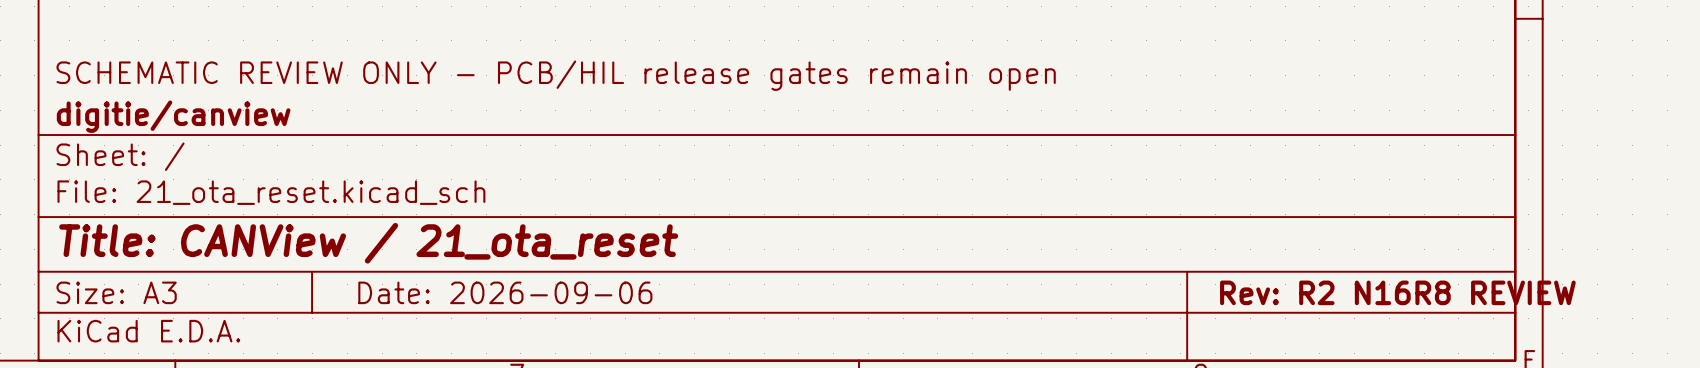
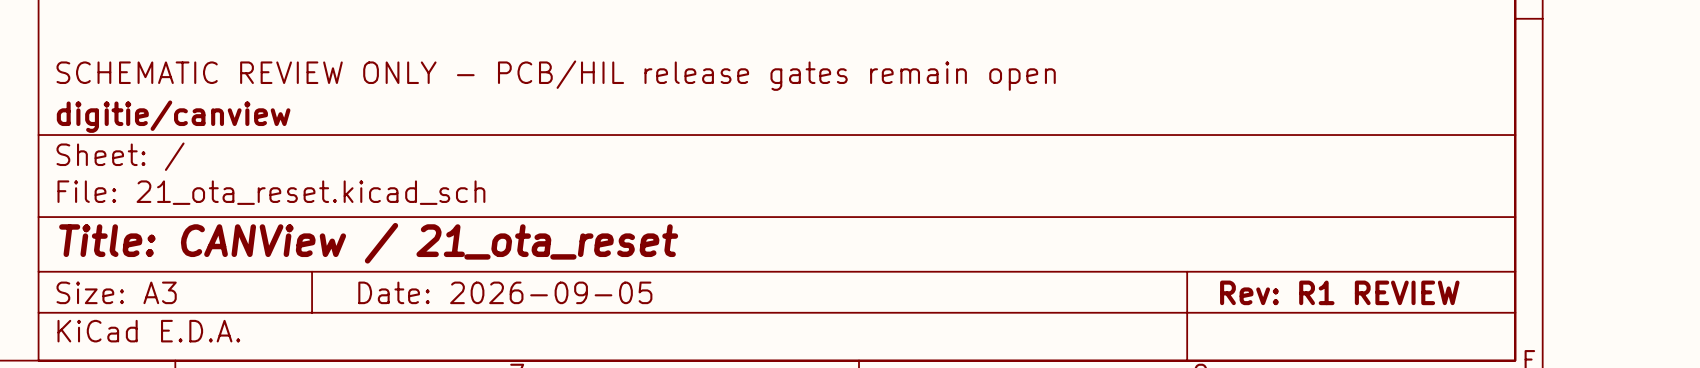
title block: Date: 2026-09-06 (505, 292) -> Date: 2026-09-05 (505, 292)
title block: Rev: R2 N16R8 REVIEW (1397, 292) -> Rev: R1 REVIEW (1339, 292)

